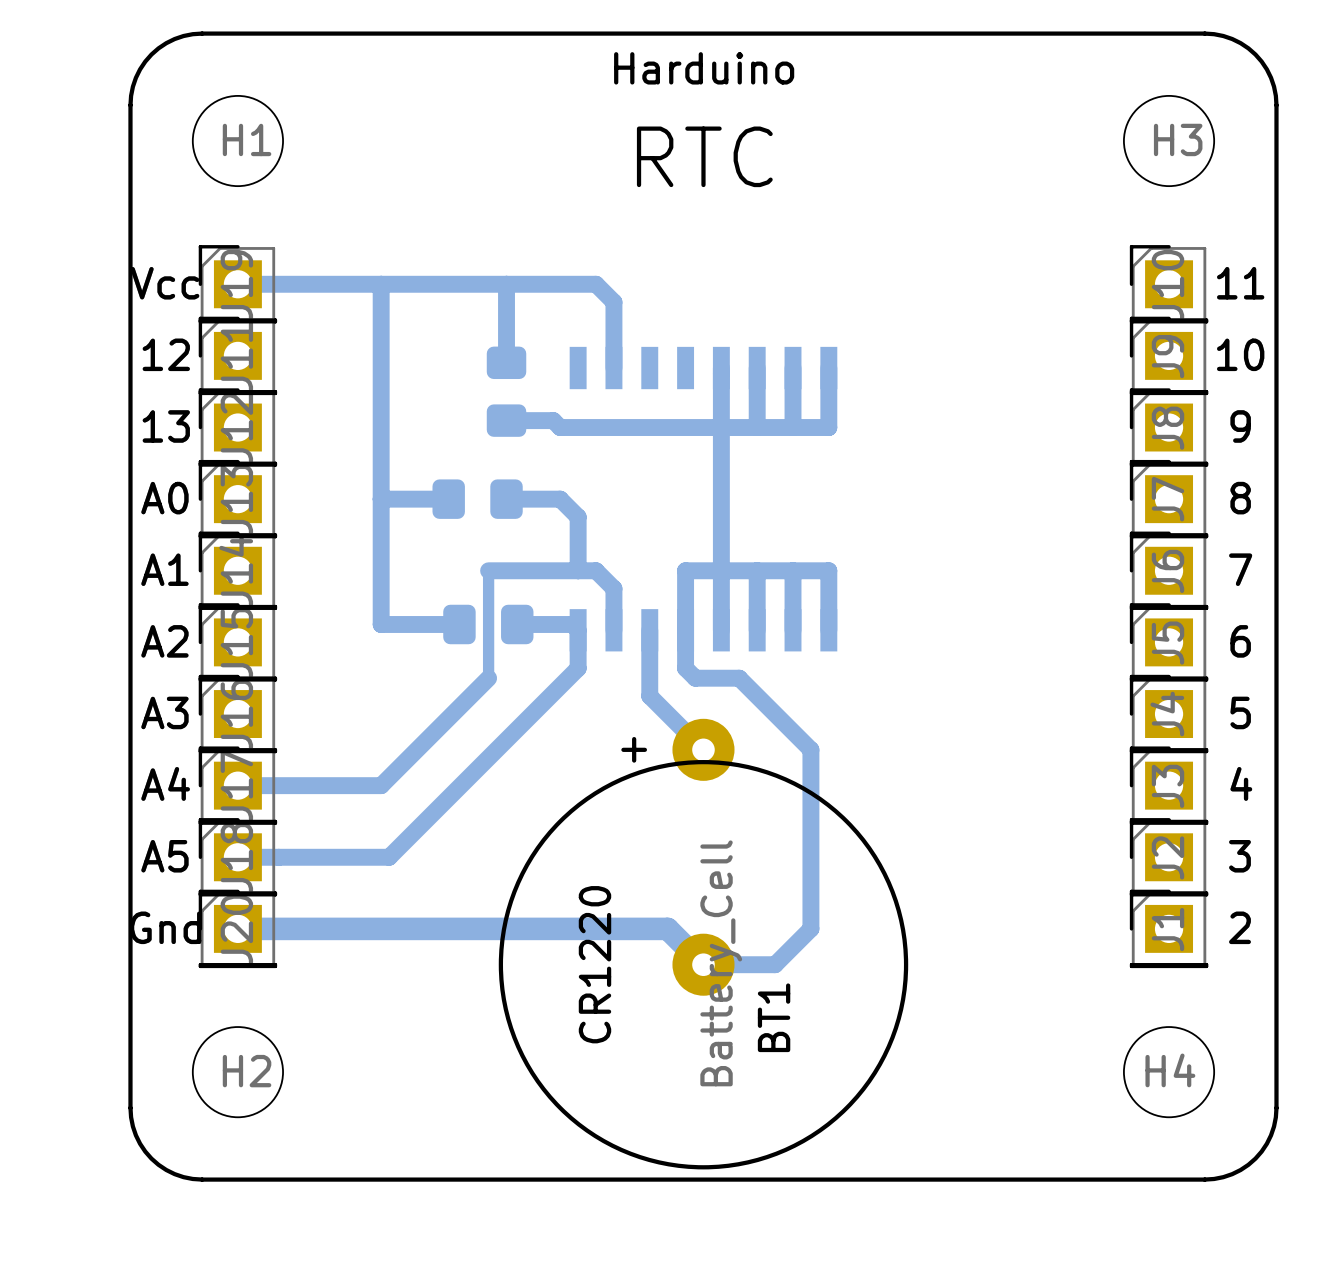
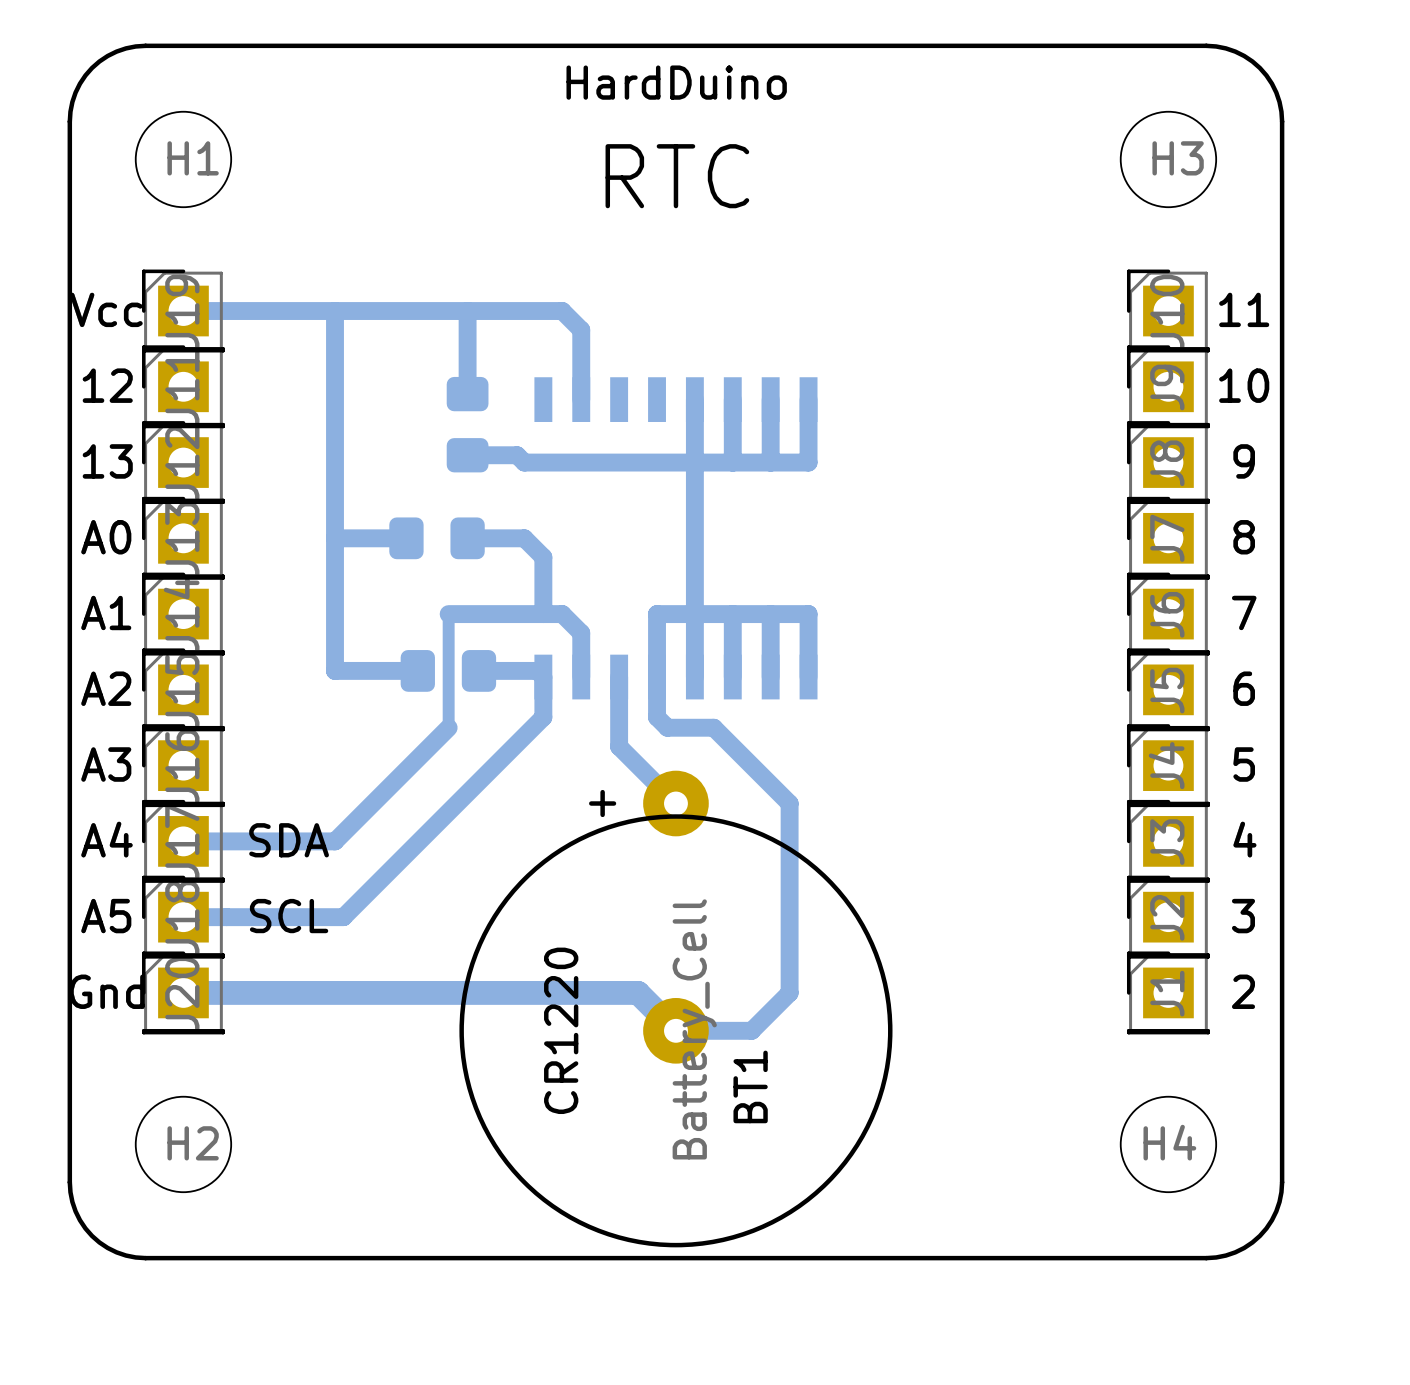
text: Harduino (704, 68) -> HardDuino (676, 82)
text: none -> SDA (289, 840)
text: none -> SCL (289, 916)

